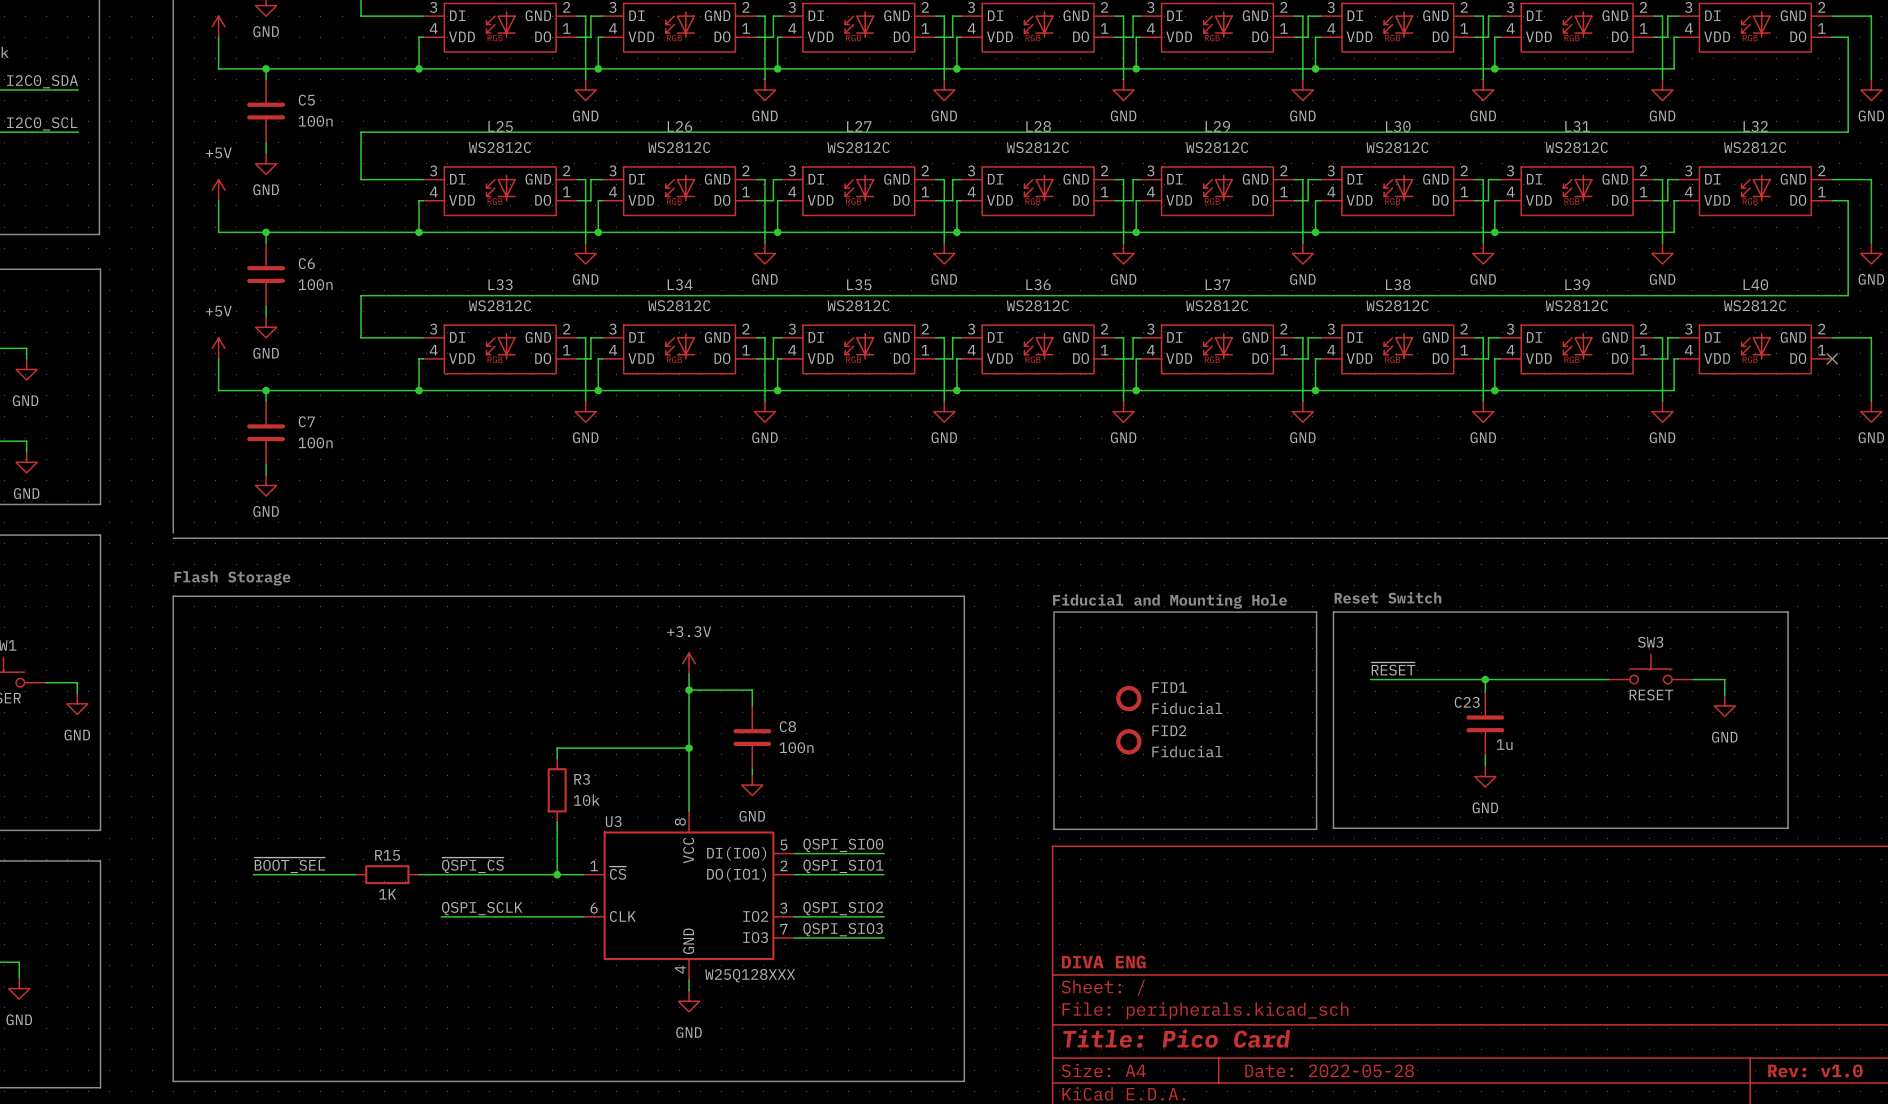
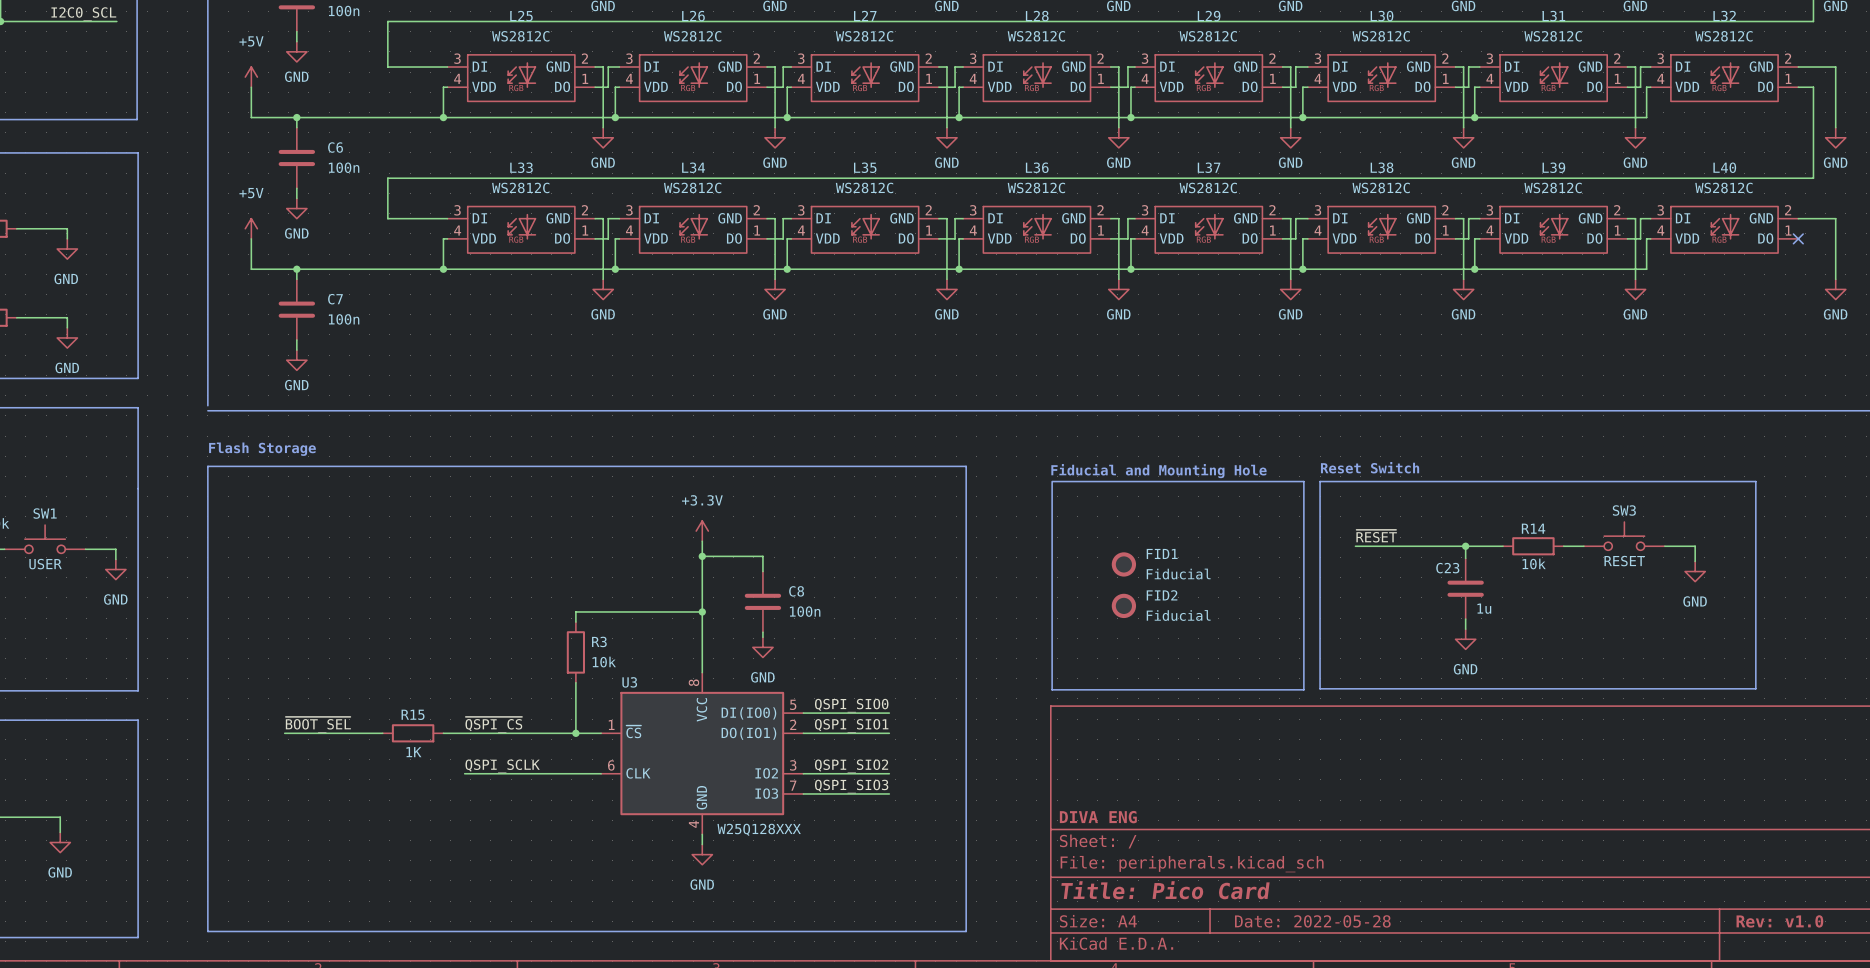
wire: (1524, 679) (1587, 679) -> none
R14: none -> 10k (1533, 546)

